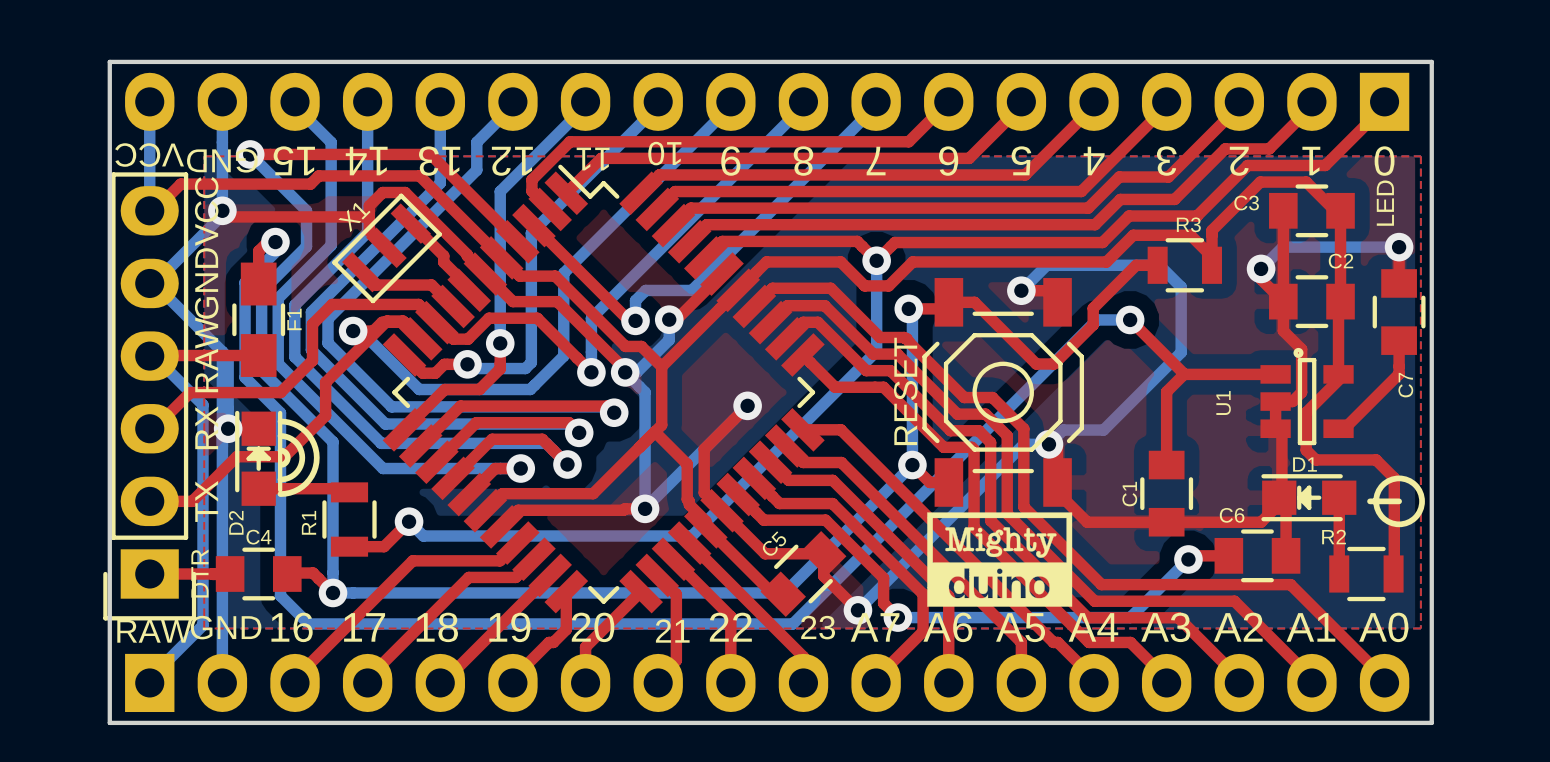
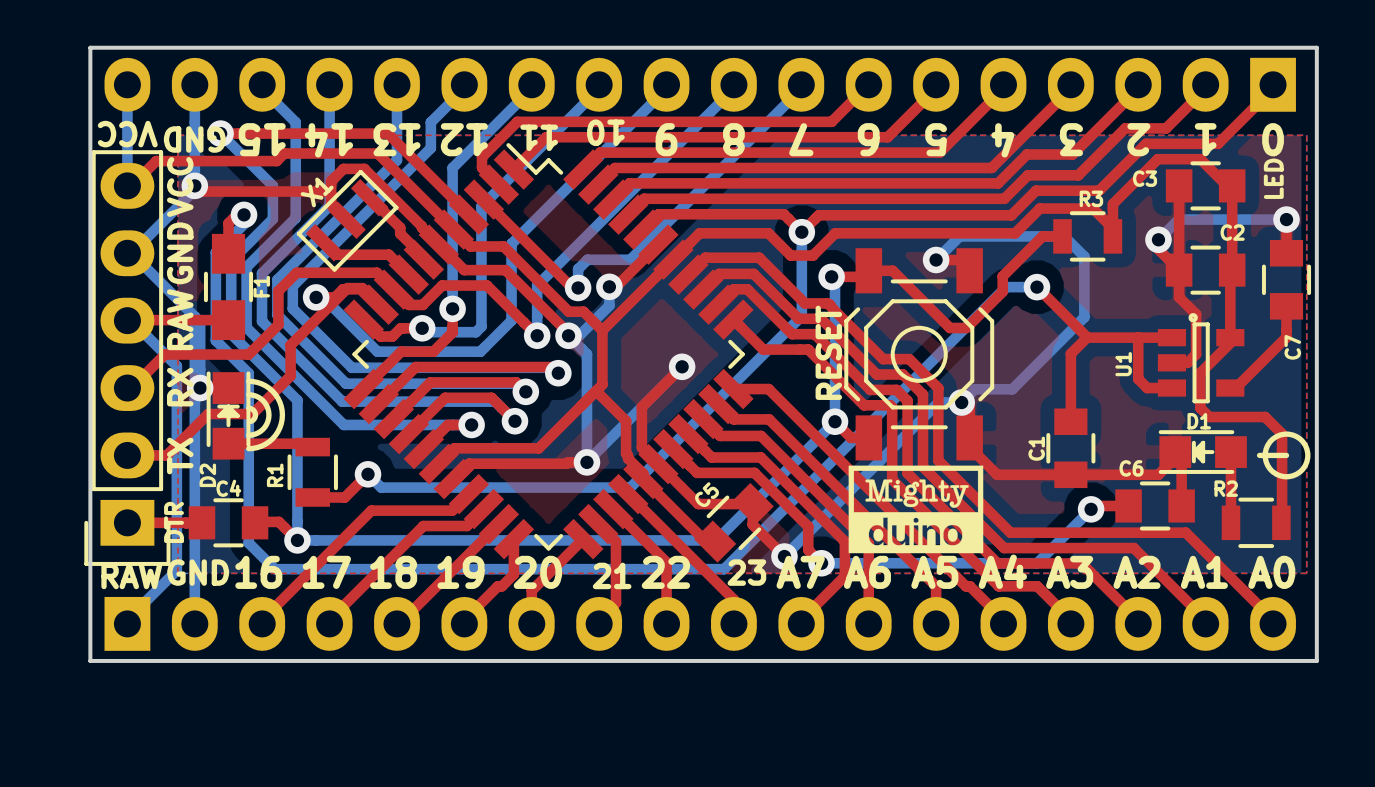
top track: none -> (1138, 337) (1138, 379) (1147, 388) (1171, 388)
top track: (1275, 401) (1275, 428) (1281, 435) (1281, 501) -> none

